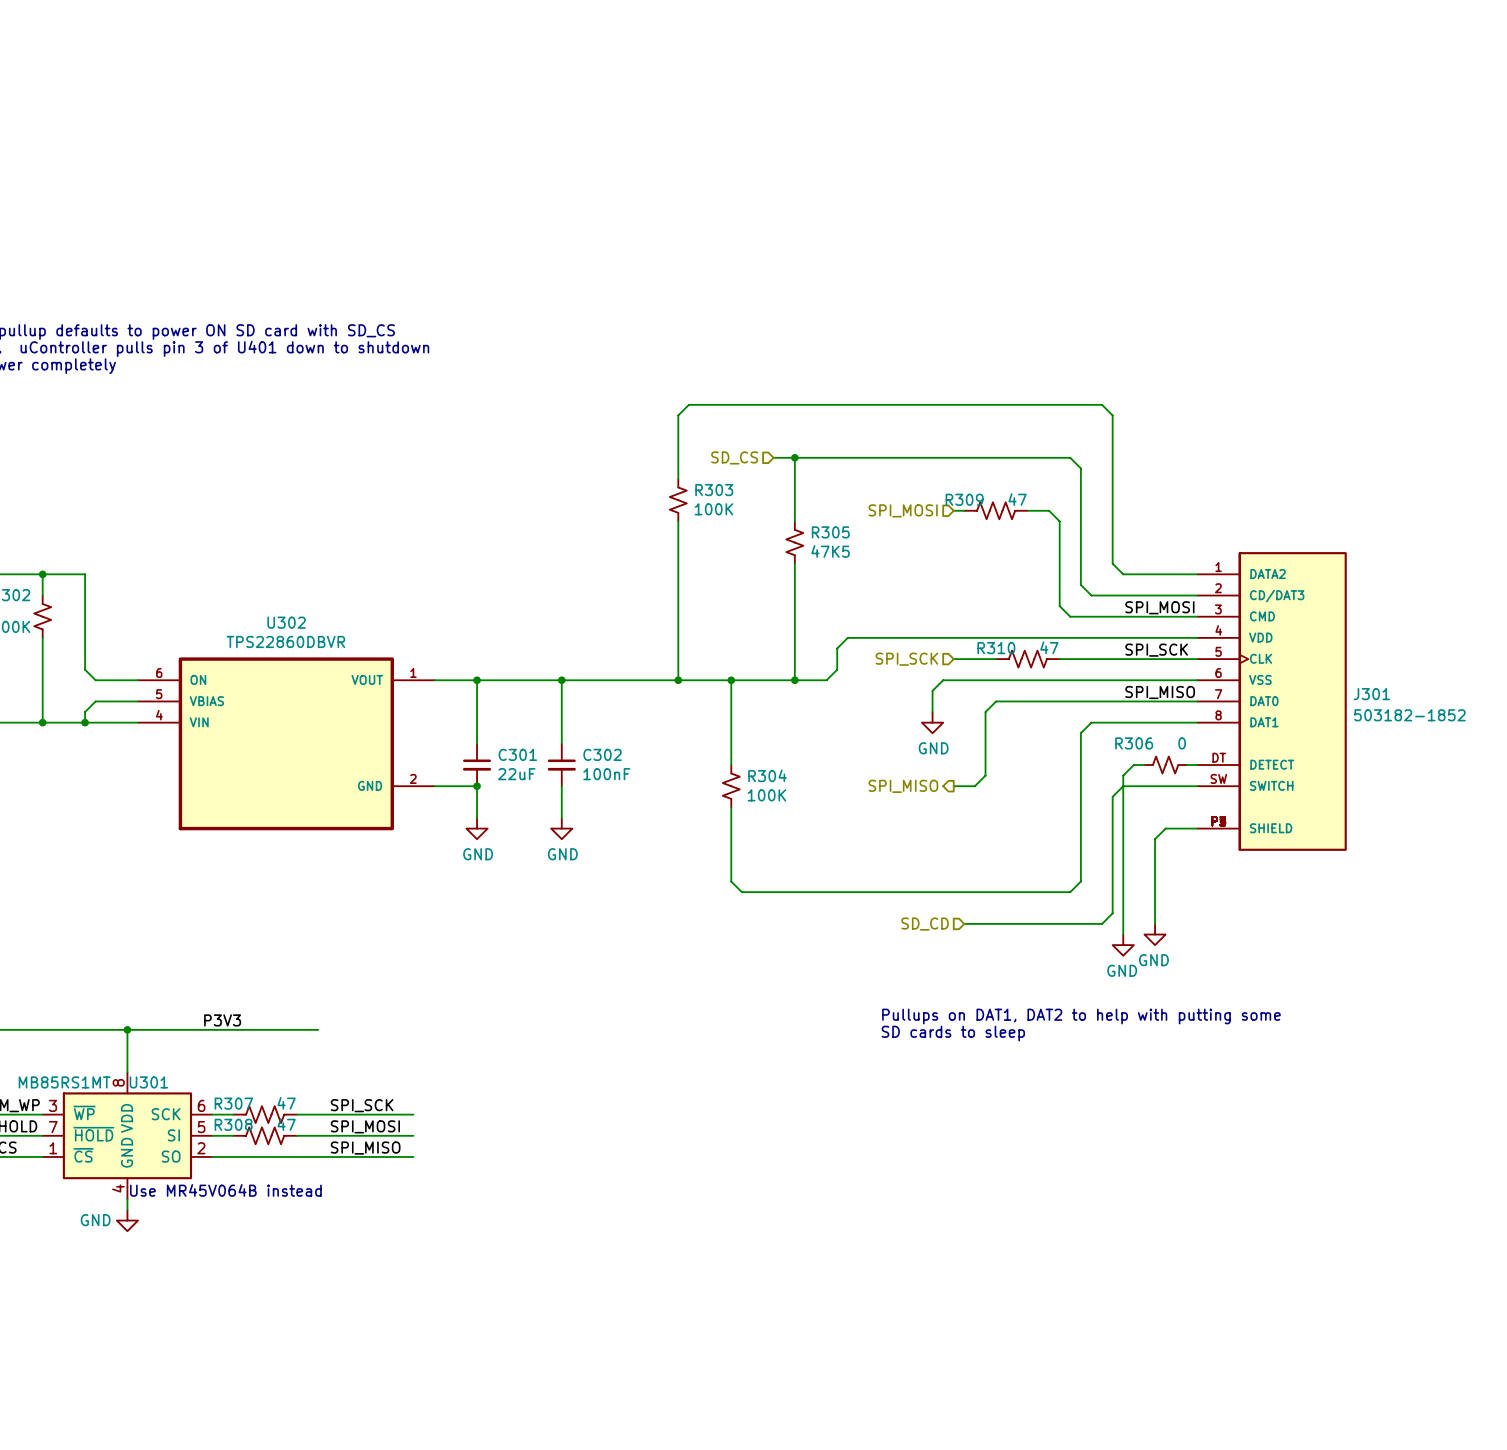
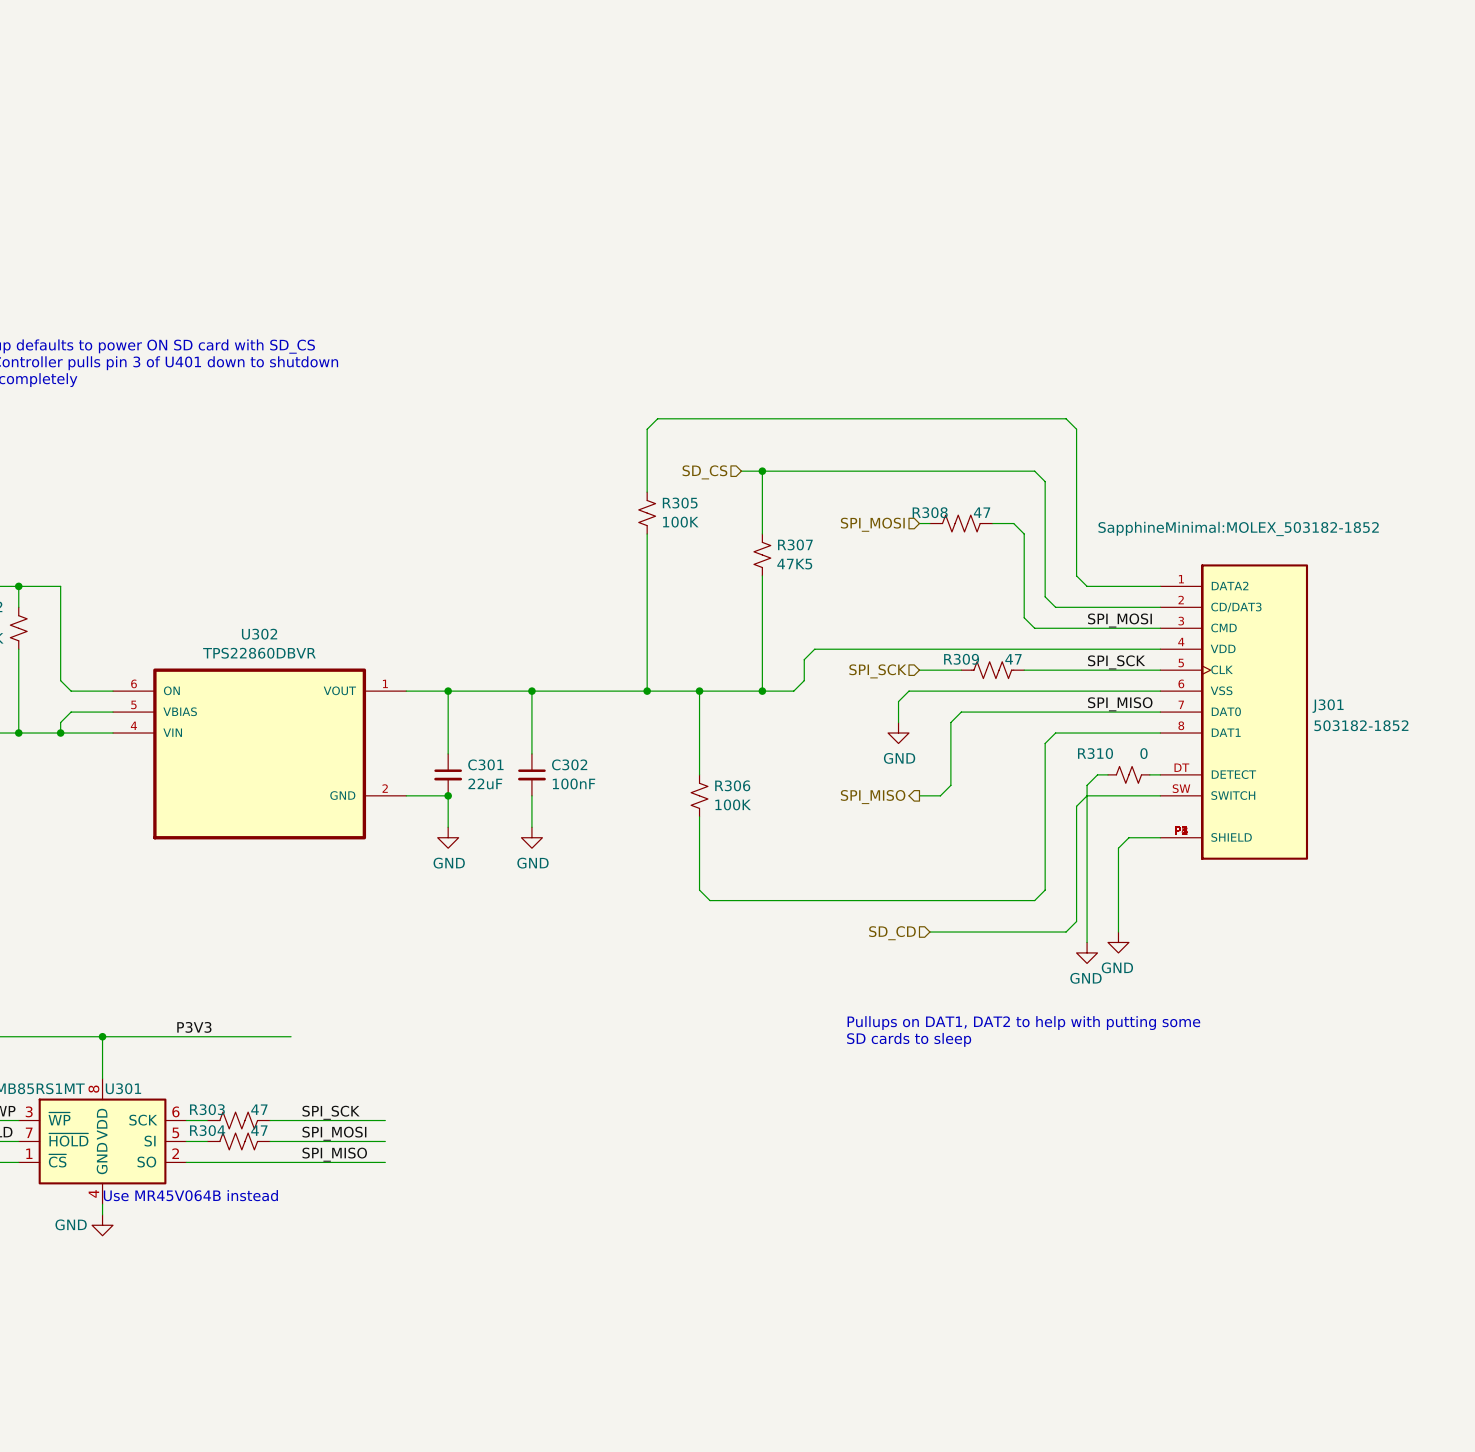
R303 name: R303 (714, 490) -> R305 (680, 503)
R309 name: R309 (964, 499) -> R308 (930, 512)
J301 text: none -> SapphineMinimal:MOLEX_503182-1852 (1238, 528)
R305 name: R305 (830, 532) -> R307 (795, 544)
R310 name: R310 (996, 648) -> R309 (961, 659)
R306 name: R306 (1134, 743) -> R310 (1095, 753)
R304 name: R304 (767, 775) -> R306 (732, 785)
R307 name: R307 (233, 1103) -> R303 (207, 1109)
R308 name: R308 (233, 1124) -> R304 (207, 1130)

